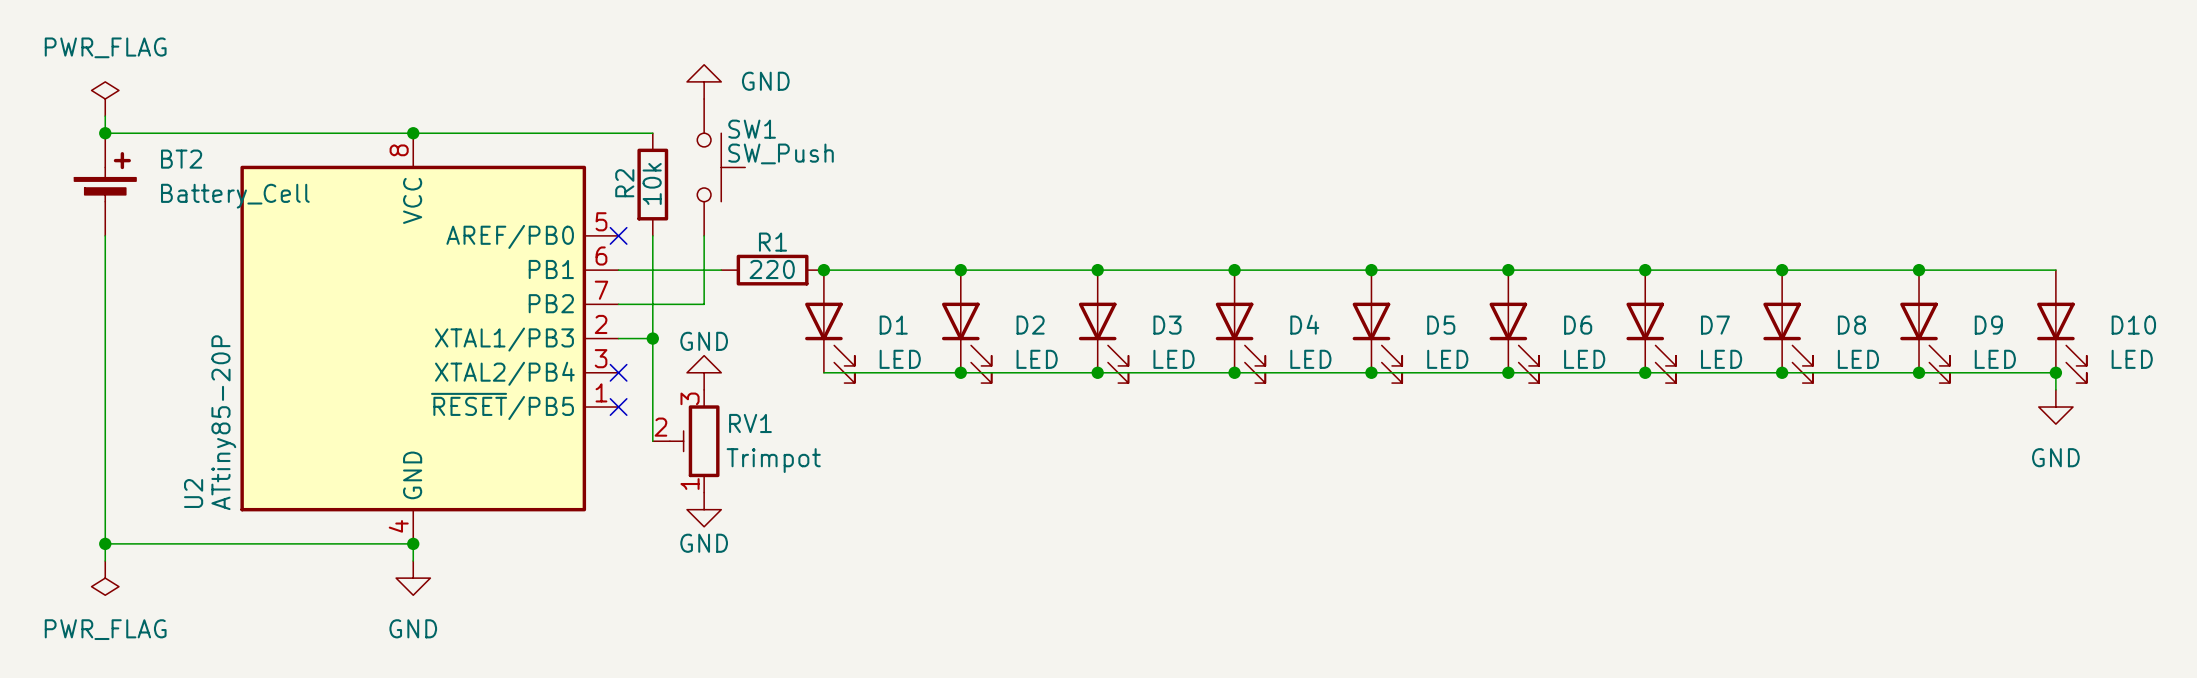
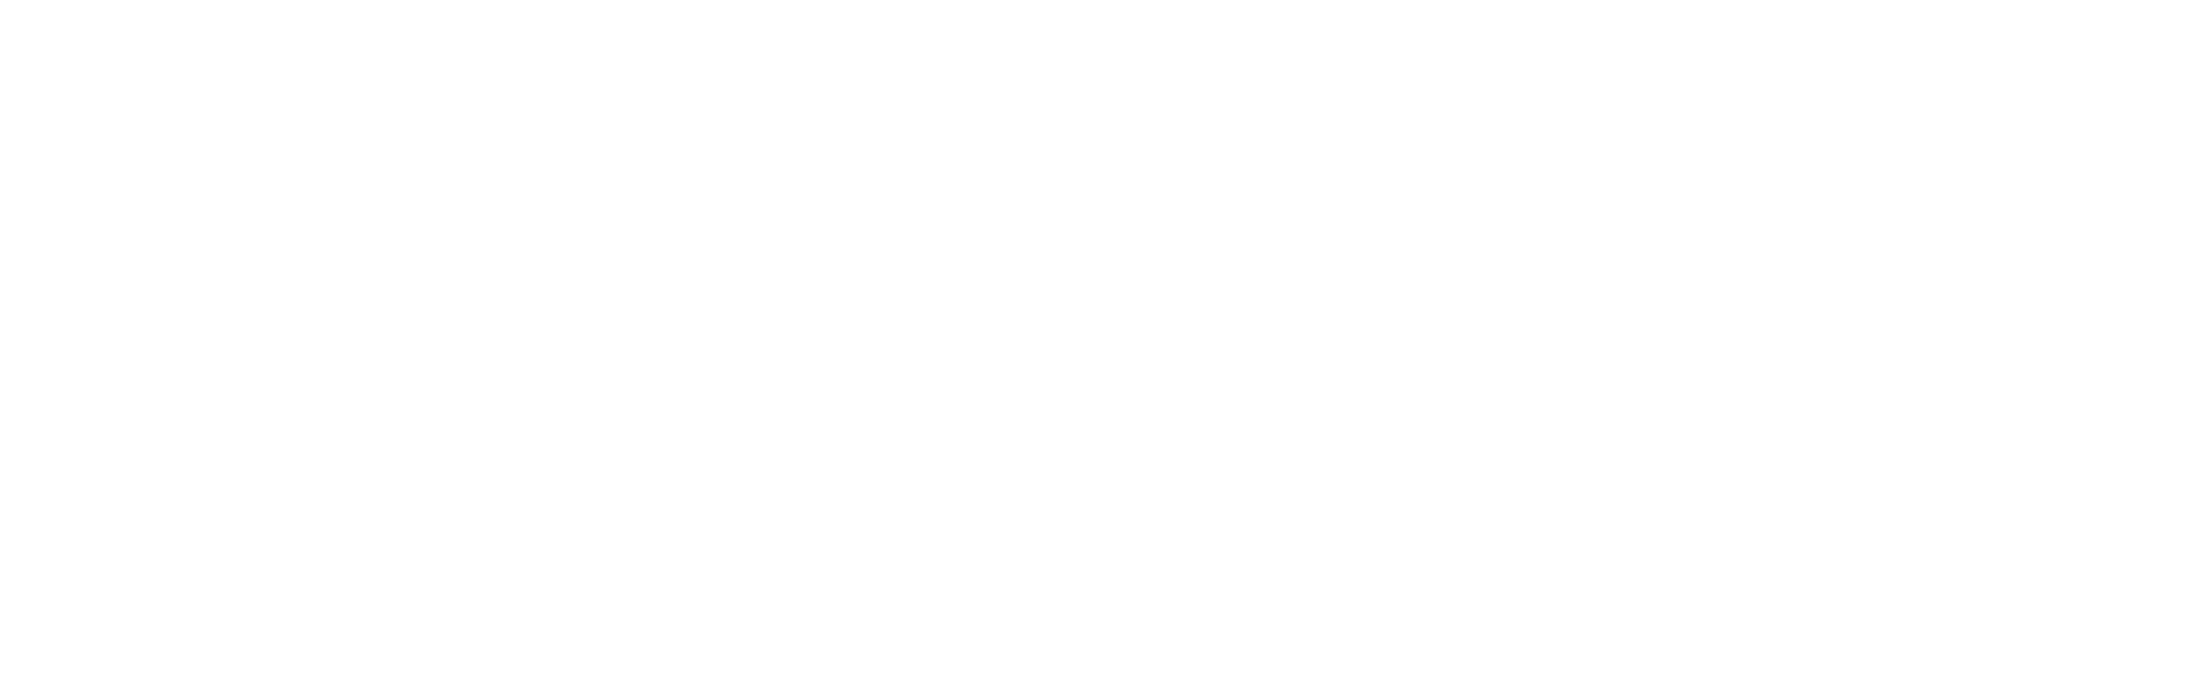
power symbol: GND (704, 81) -> none
power symbol: PWR_FLAG (105, 99) -> none
wire: (105, 116) (105, 133) (652, 133) -> none
junction: (105, 133) -> none
junction: (413, 133) -> none
SW1: SW_Push (721, 167) -> none
BT2: Battery_Cell (105, 184) -> none
R2: 10k (652, 184) -> none
wire: (105, 235) (105, 561) -> none
no-connect mark: (618, 235) -> none
wire: (652, 235) (652, 441) -> none
wire: (704, 235) (704, 304) (618, 304) -> none
wire: (618, 270) (721, 270) -> none
R1: 220 (772, 270) -> none
wire: (823, 270) (2055, 270) -> none
junction: (823, 270) -> none
junction: (960, 270) -> none
junction: (1097, 270) -> none
junction: (1234, 270) -> none
junction: (1371, 270) -> none
junction: (1508, 270) -> none
junction: (1645, 270) -> none
junction: (1782, 270) -> none
junction: (1919, 270) -> none
D1: LED (829, 326) -> none
D2: LED (966, 326) -> none
D3: LED (1103, 326) -> none
D4: LED (1240, 326) -> none
D5: LED (1377, 326) -> none
D6: LED (1514, 326) -> none
D7: LED (1651, 326) -> none
D8: LED (1788, 326) -> none
D9: LED (1925, 326) -> none
D10: LED (2061, 326) -> none
U2: ATtiny85-20P (429, 338) -> none
wire: (618, 338) (652, 338) -> none
junction: (652, 338) -> none
no-connect mark: (618, 372) -> none
power symbol: GND (704, 372) -> none
wire: (823, 372) (2055, 372) (2055, 389) -> none
junction: (960, 372) -> none
junction: (1097, 372) -> none
junction: (1234, 372) -> none
junction: (1371, 372) -> none
junction: (1508, 372) -> none
junction: (1645, 372) -> none
junction: (1782, 372) -> none
junction: (1919, 372) -> none
junction: (2055, 372) -> none
no-connect mark: (618, 407) -> none
power symbol: GND (2055, 407) -> none
RV1: Trimpot (686, 441) -> none
power symbol: GND (704, 509) -> none
wire: (105, 543) (413, 543) (413, 561) -> none
junction: (105, 543) -> none
junction: (413, 543) -> none
power symbol: PWR_FLAG (105, 578) -> none
power symbol: GND (413, 578) -> none

